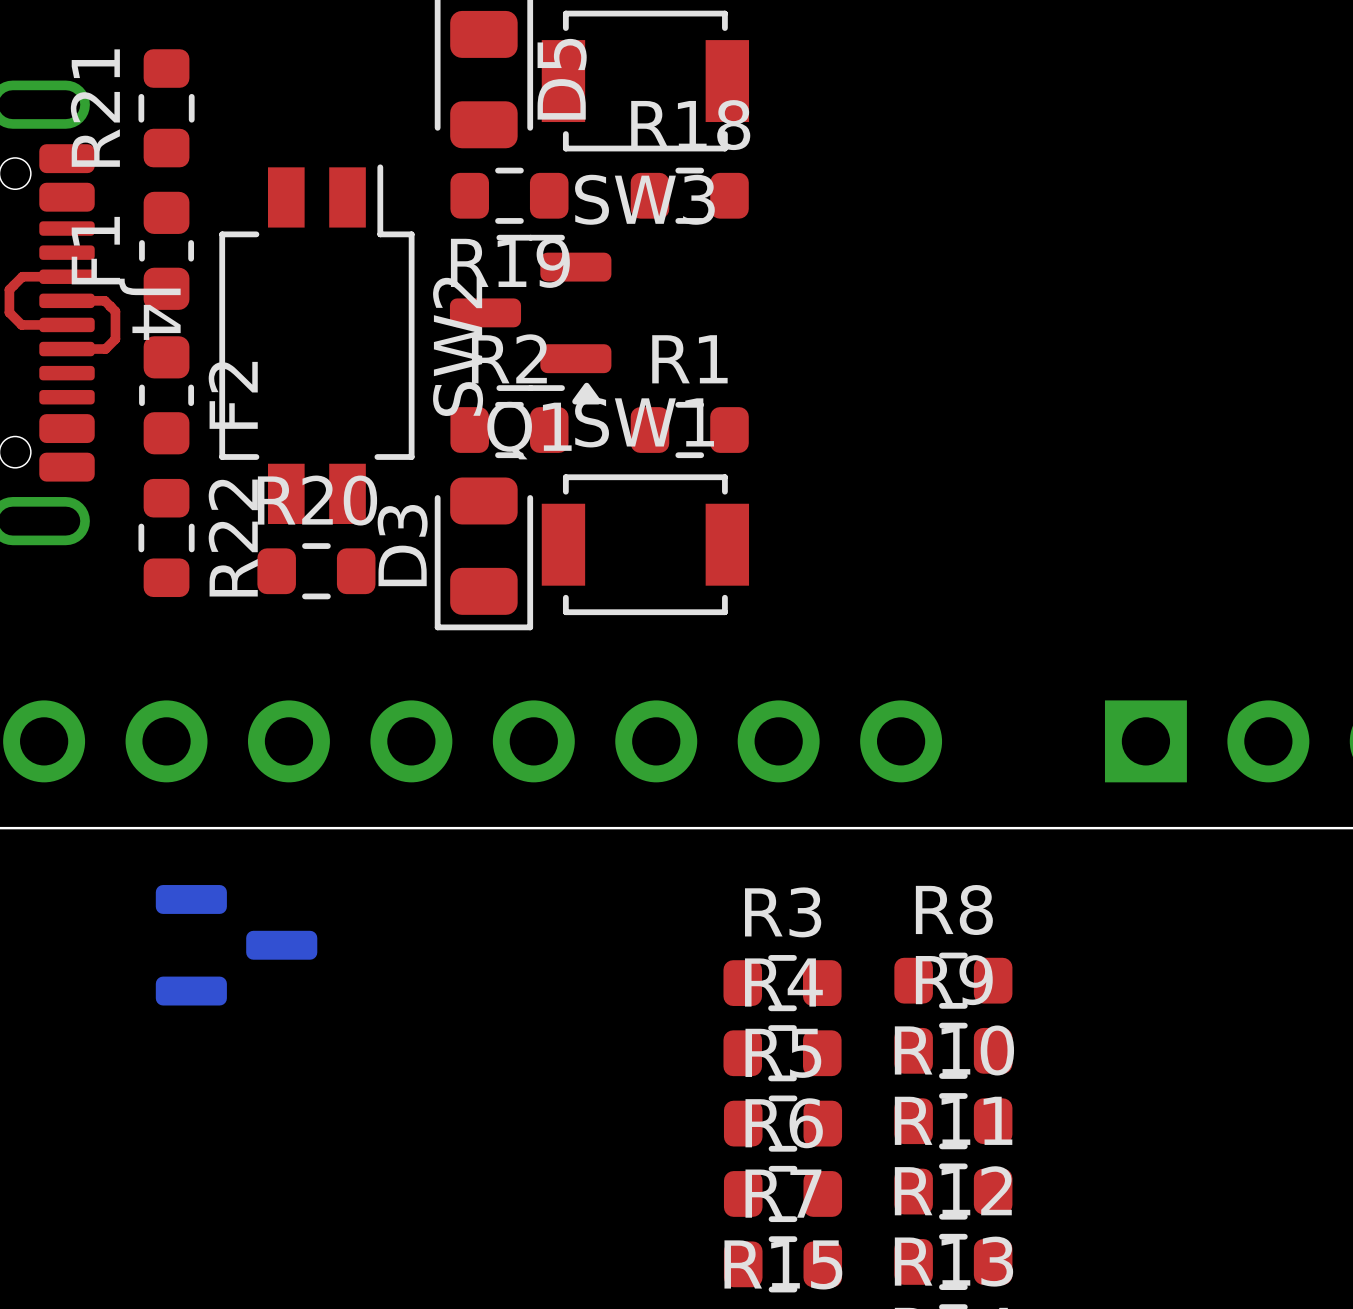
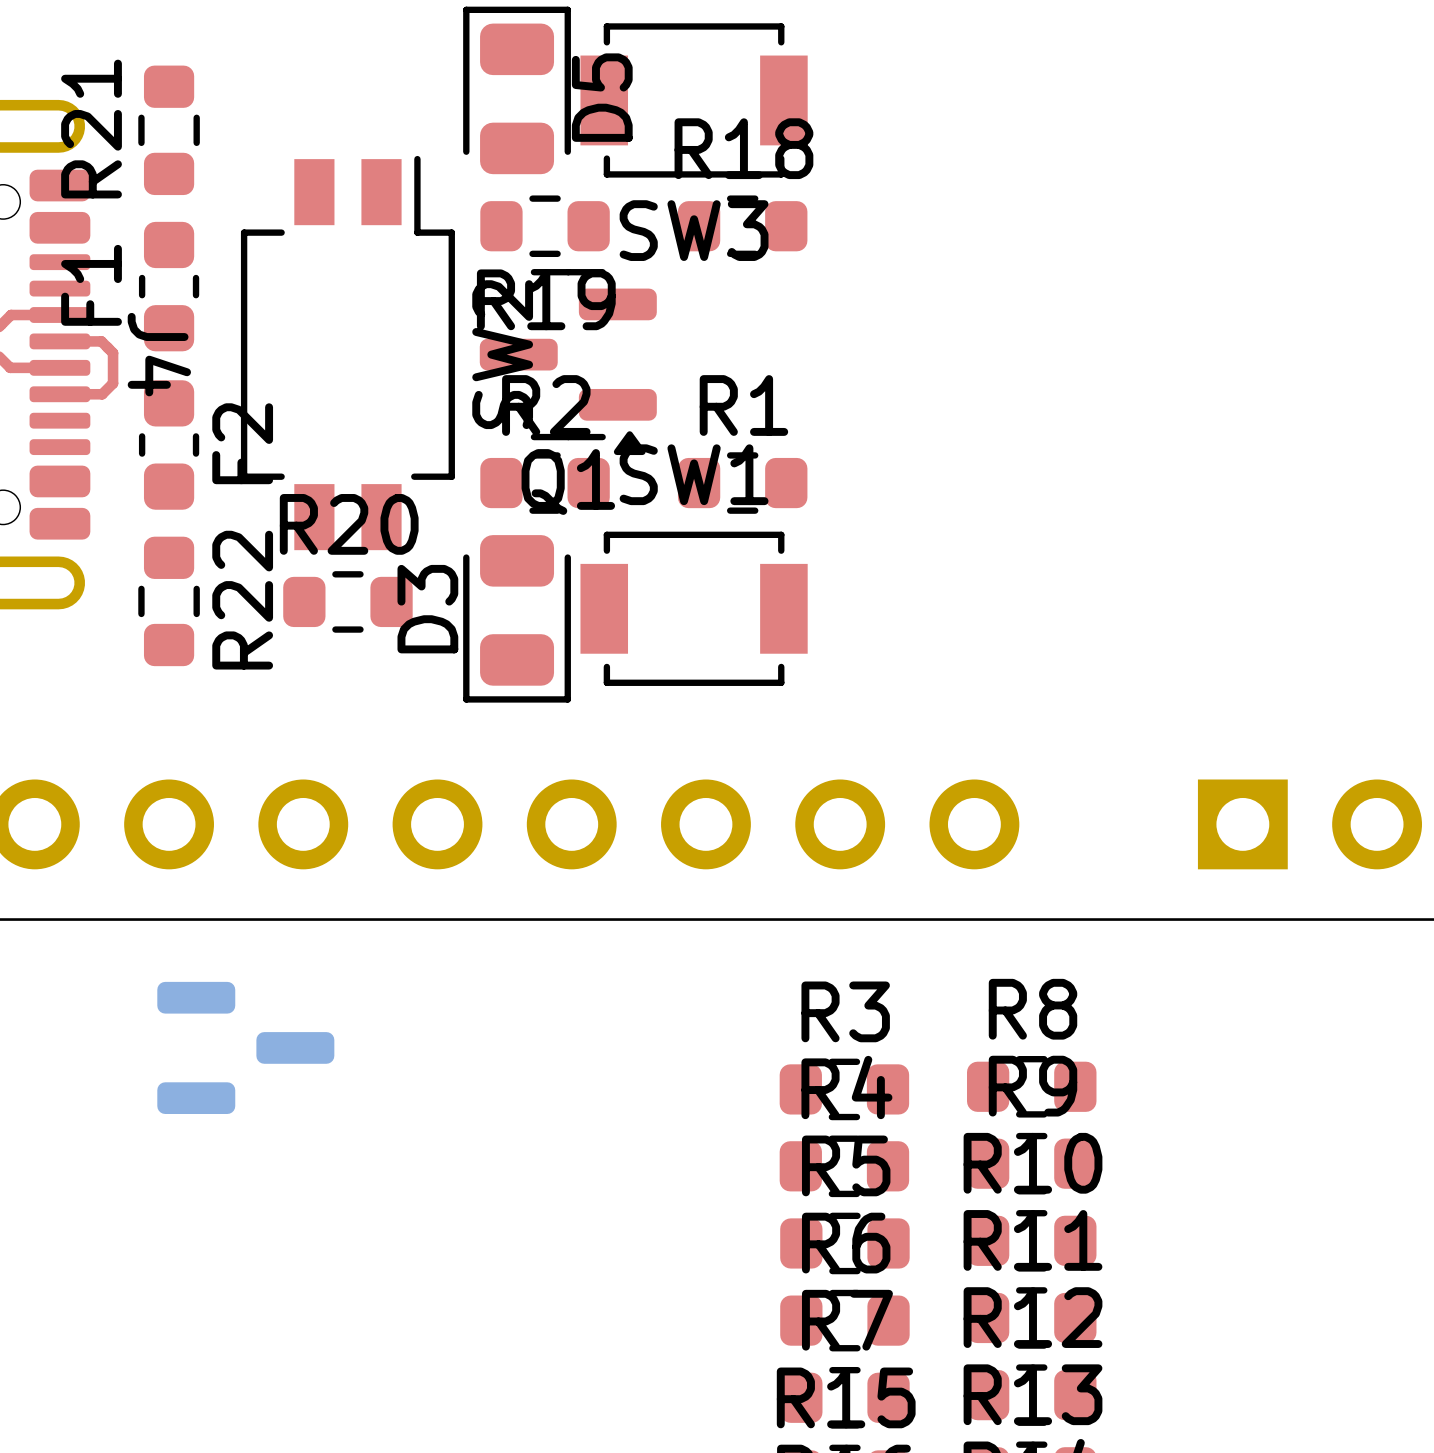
SW2 position: (316, 344) -> (347, 353)
R20 position: (316, 571) -> (347, 601)

